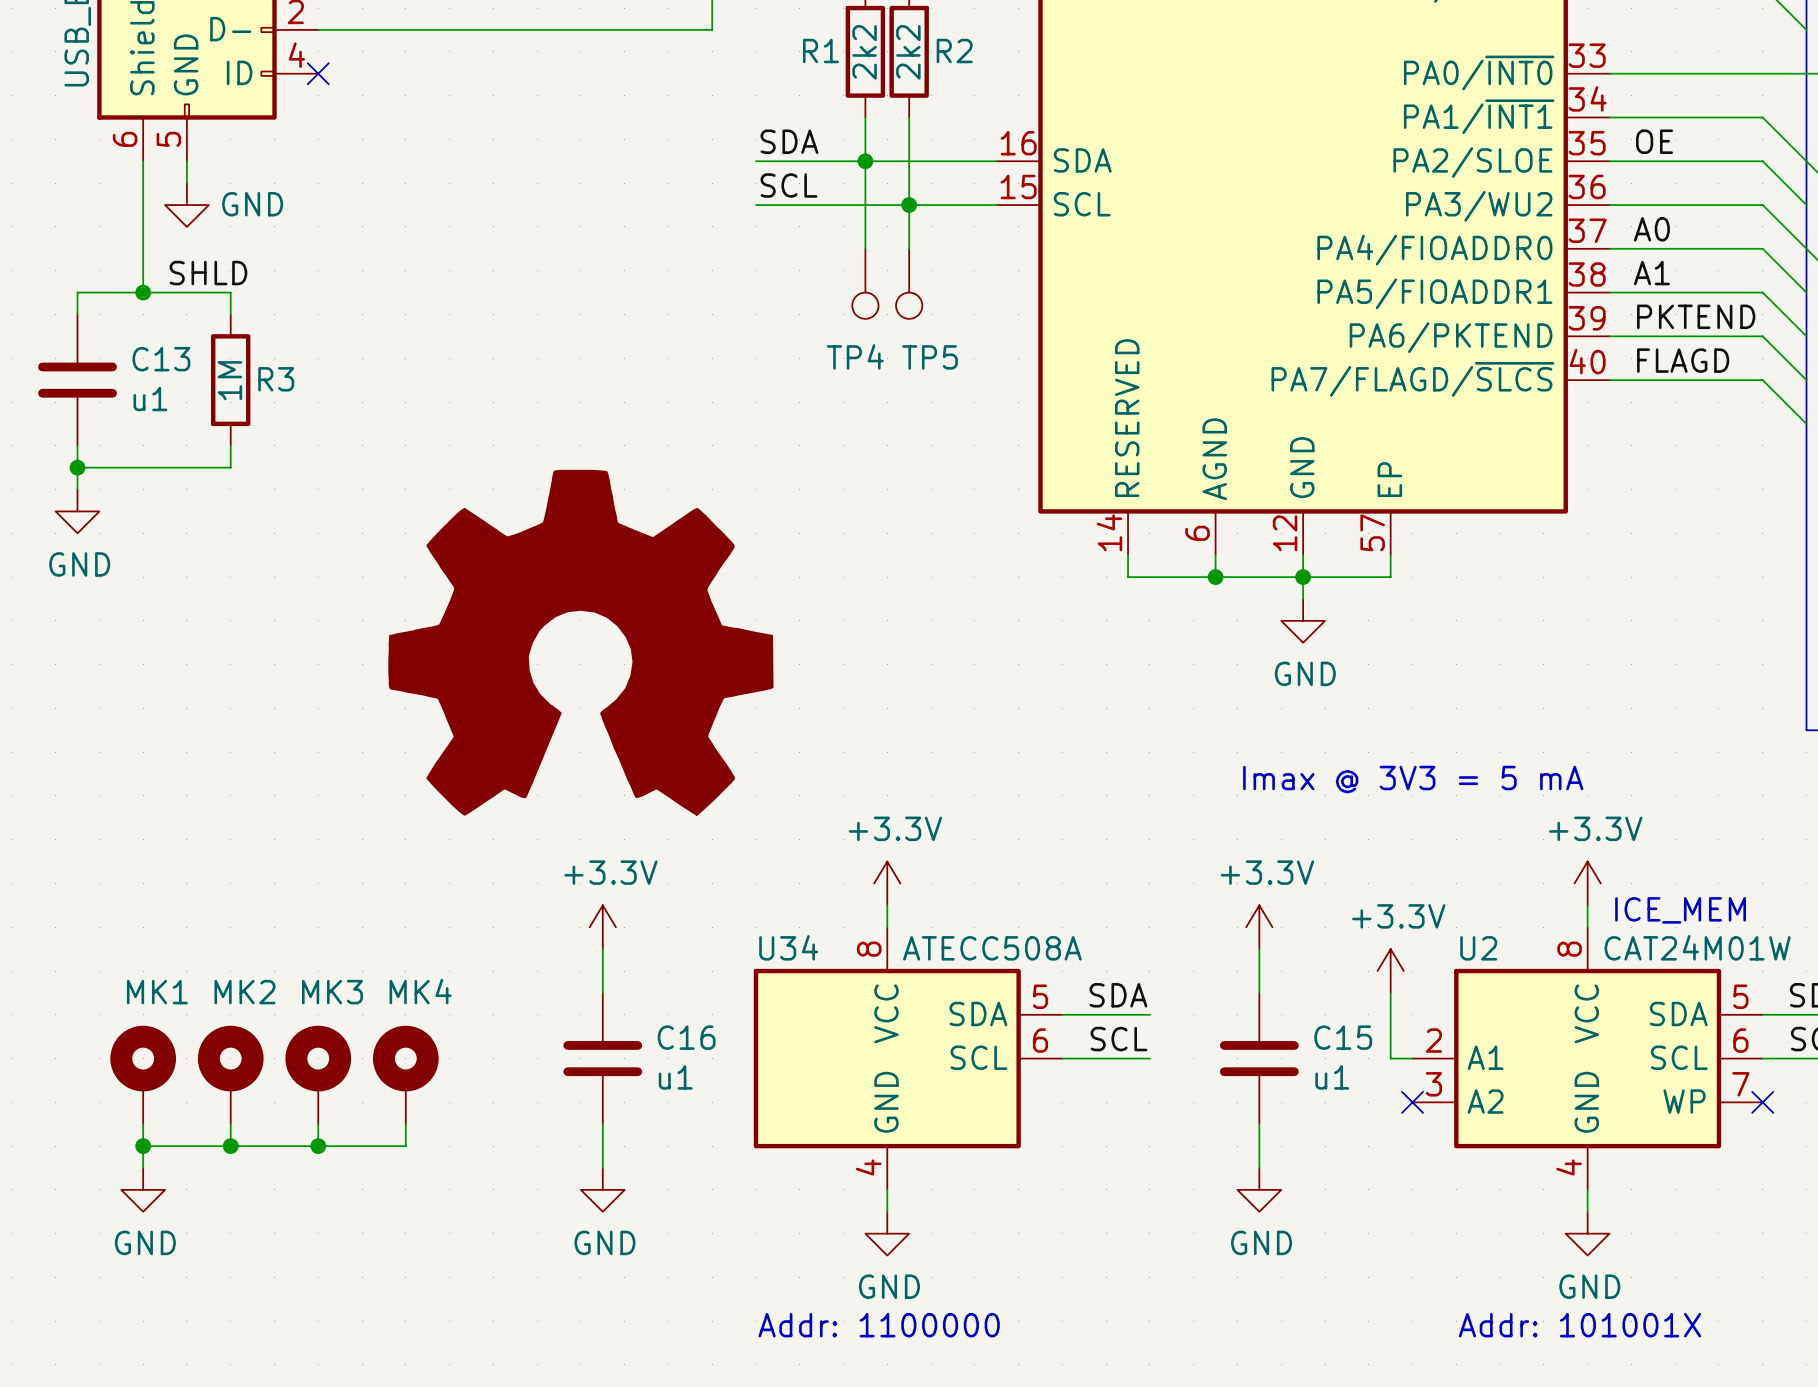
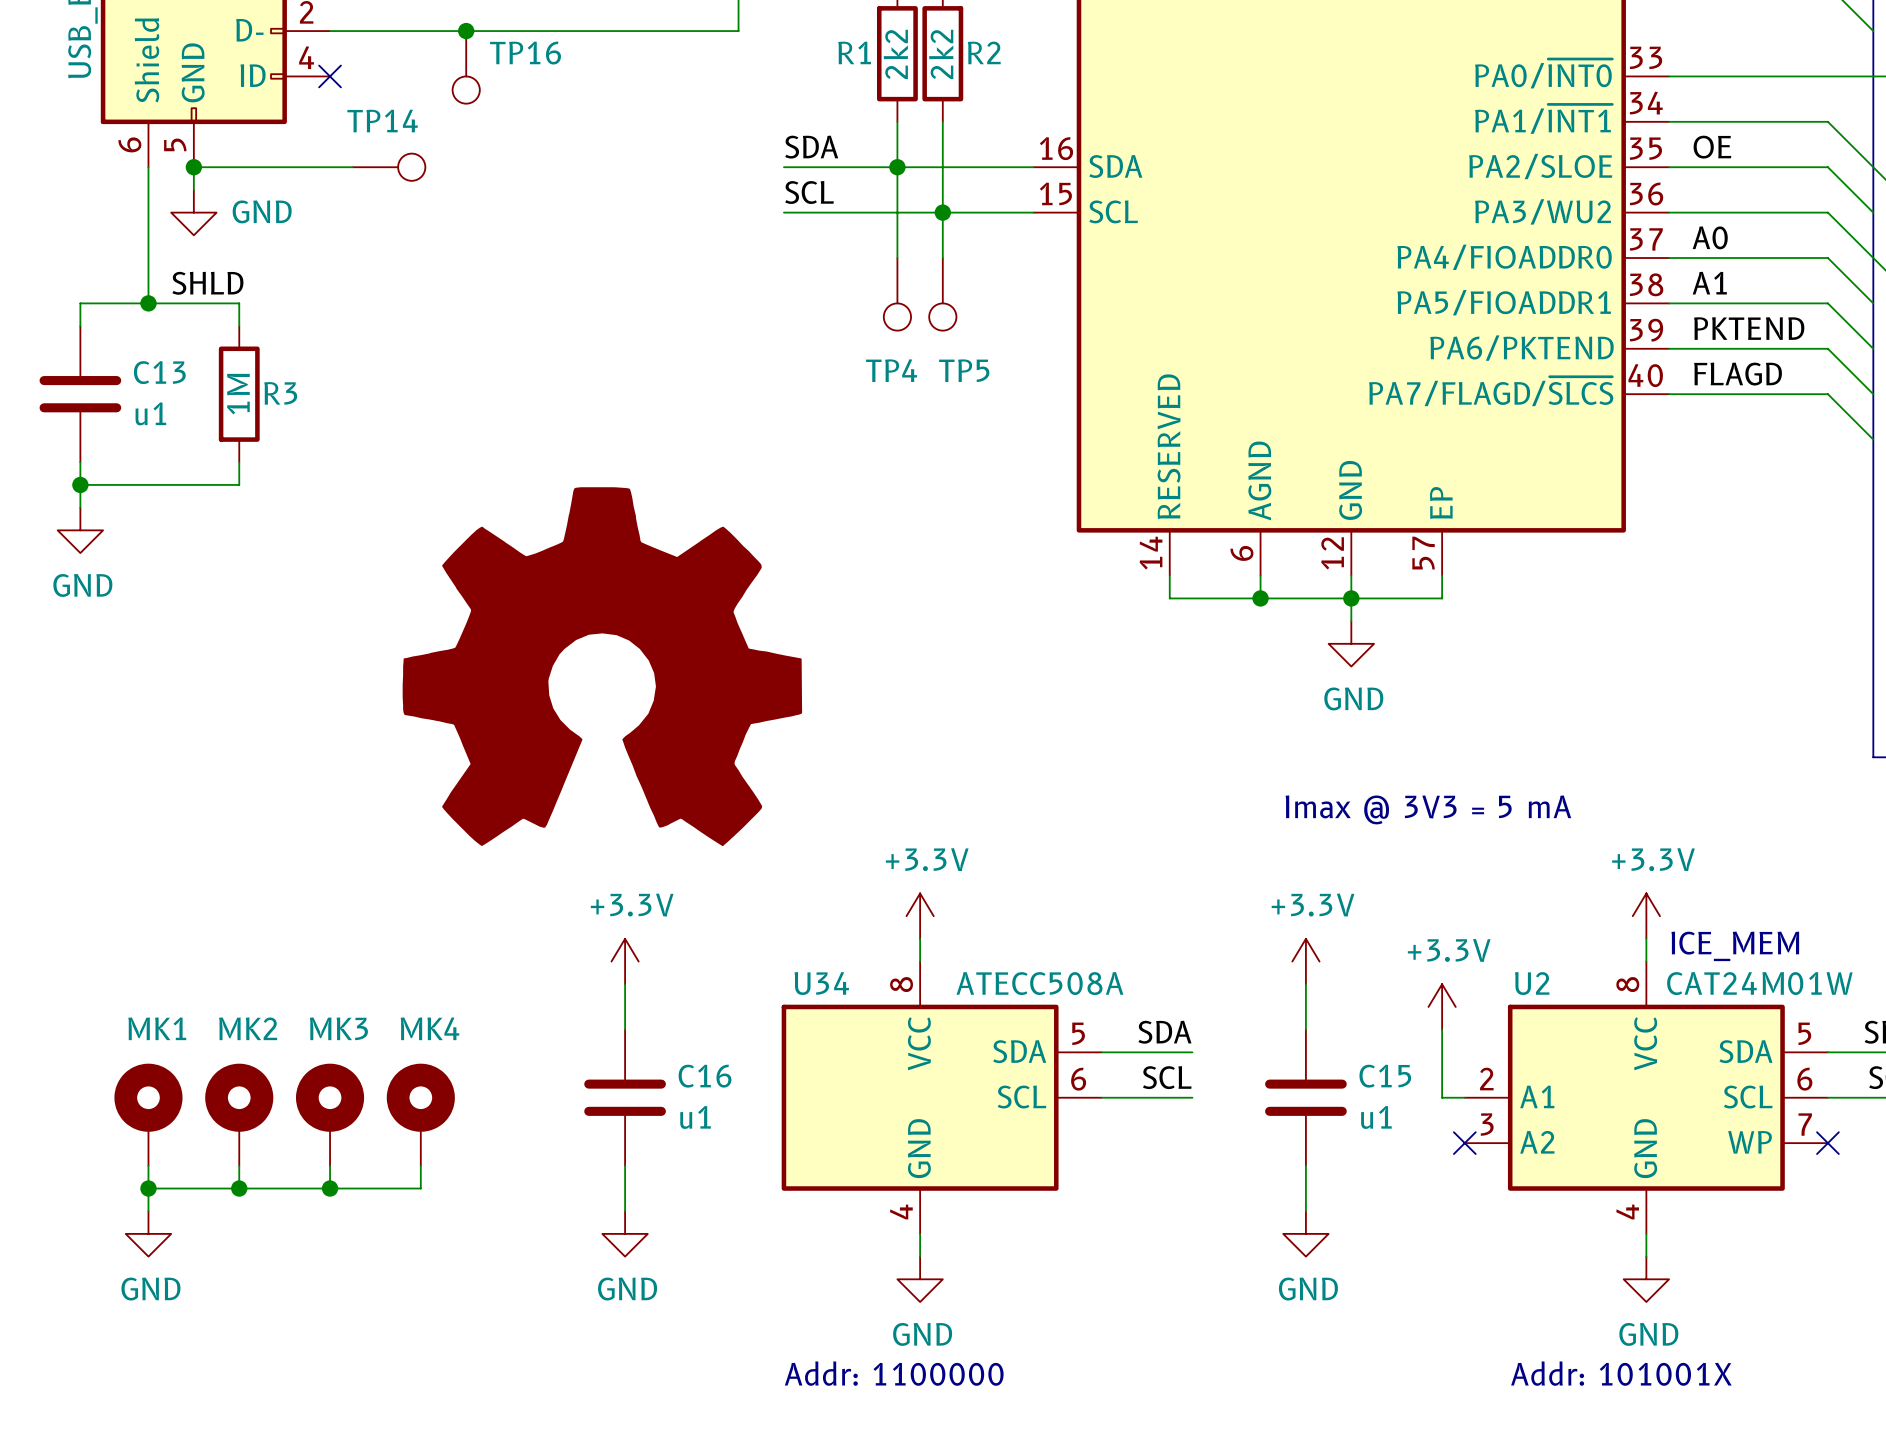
junction: none -> (466, 31)
TP16: none -> (466, 67)
wire: none -> (193, 167) (352, 167)
junction: none -> (193, 167)
TP14: none -> (389, 167)

